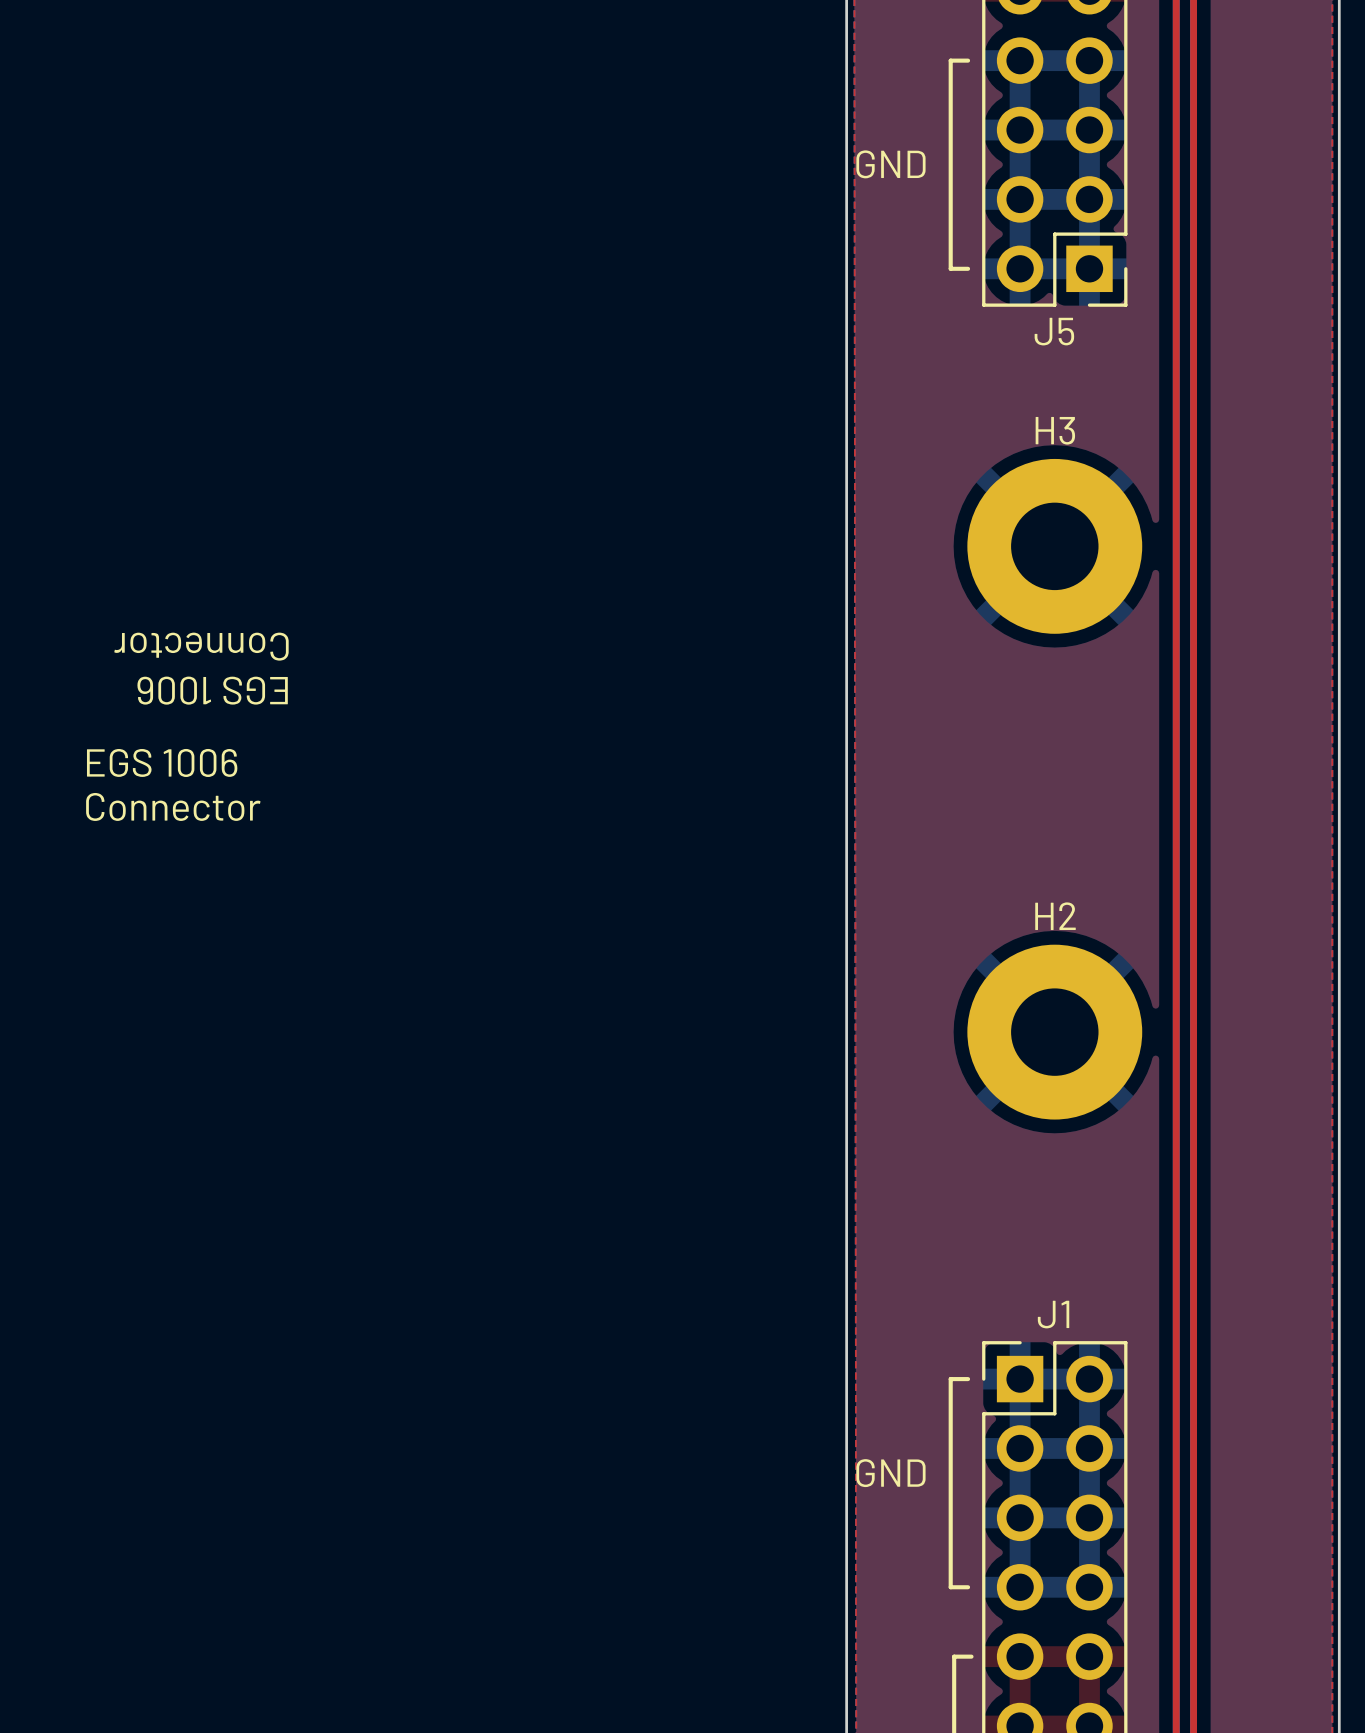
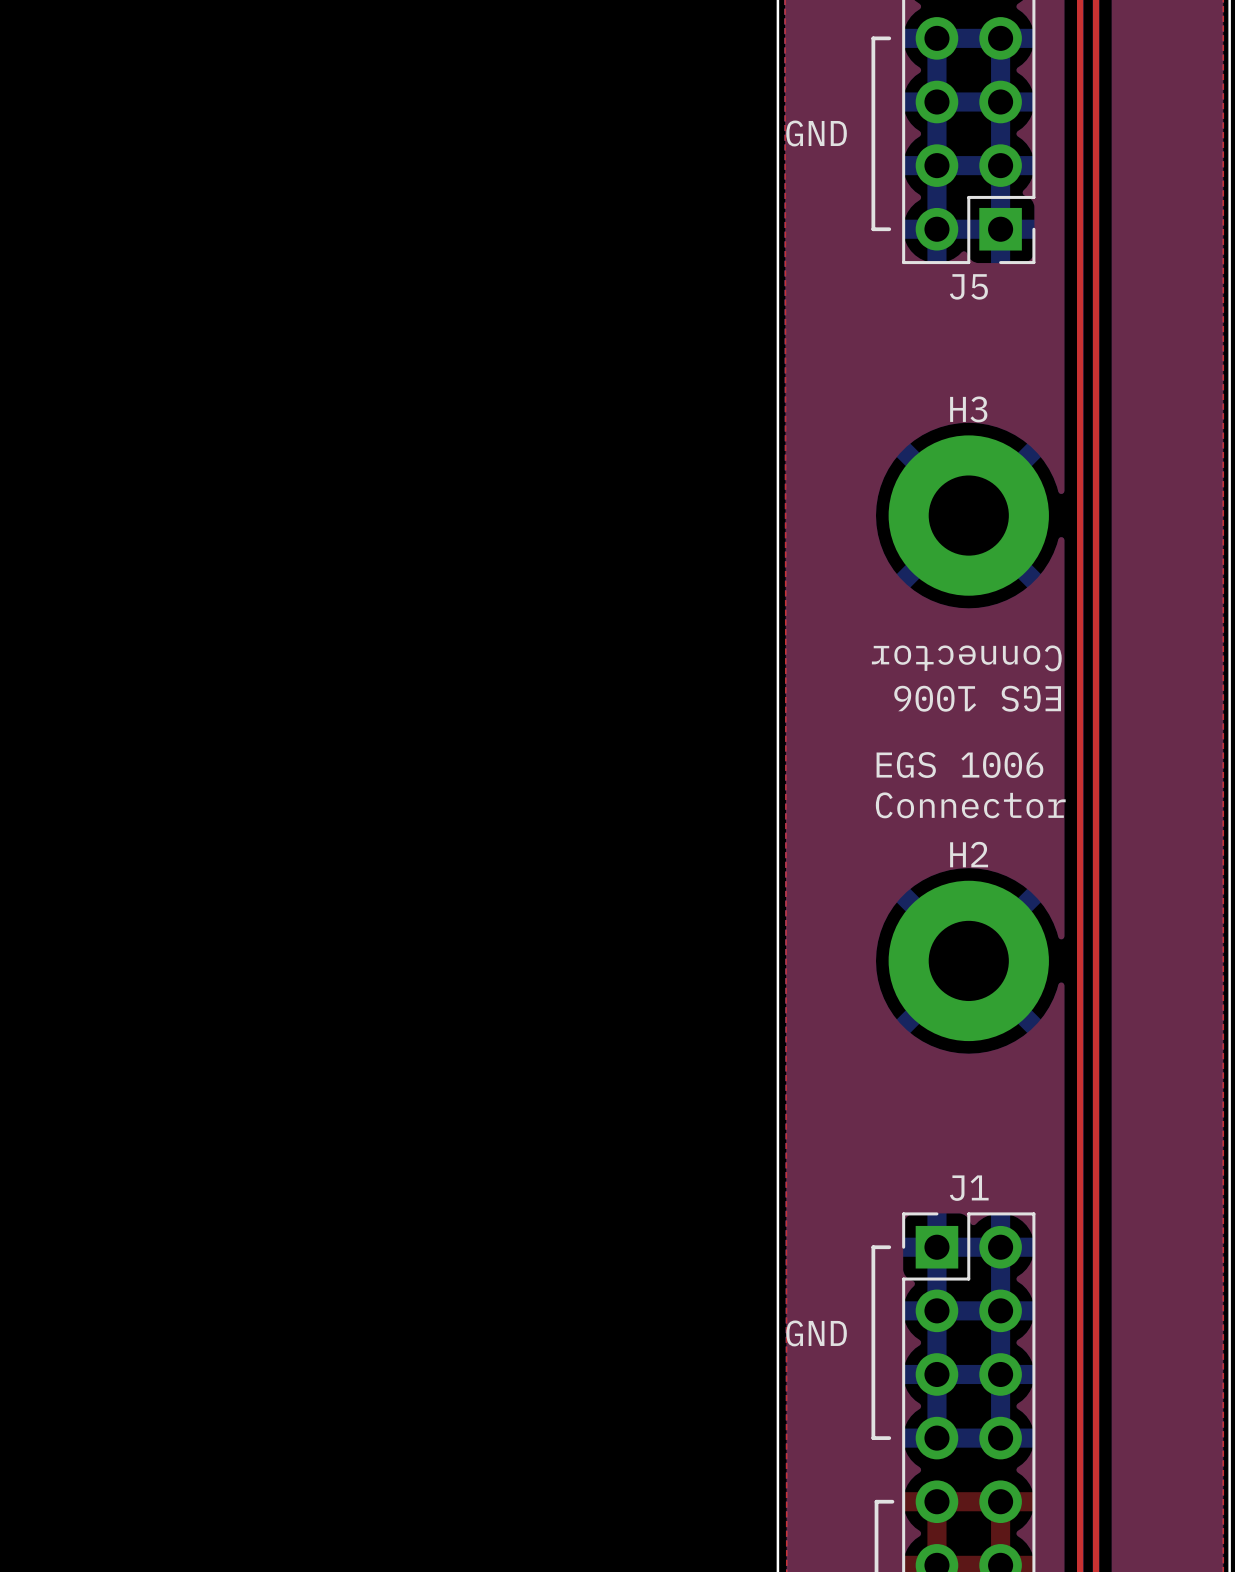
H3 position: (1054, 546) -> (968, 515)
text: Connector (201, 646) -> none
text: EGS 1006 (212, 690) -> none
text: none -> Connector (966, 658)
text: EGS 1006 (162, 762) -> none
text: none -> EGS 1006 (977, 698)
text: Connector (173, 806) -> none
text: none -> EGS 1006 (959, 765)
text: none -> Connector (970, 805)
H2 position: (1054, 1032) -> (968, 960)

